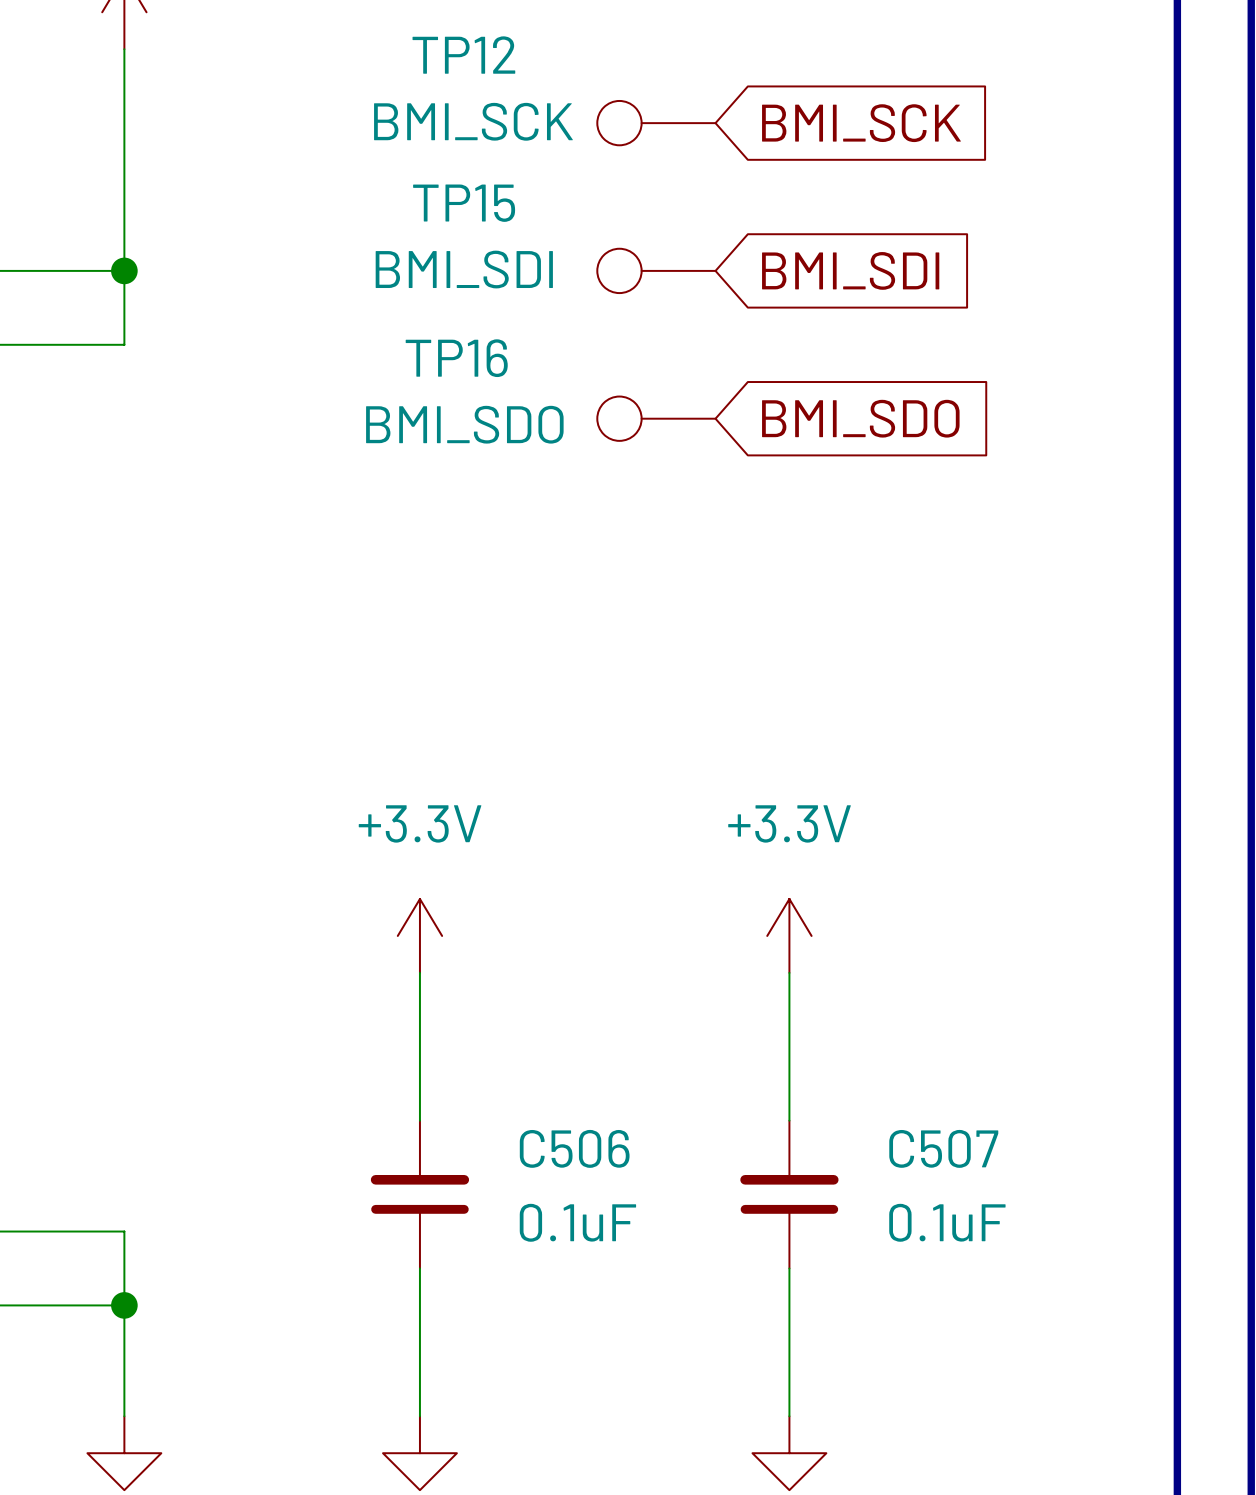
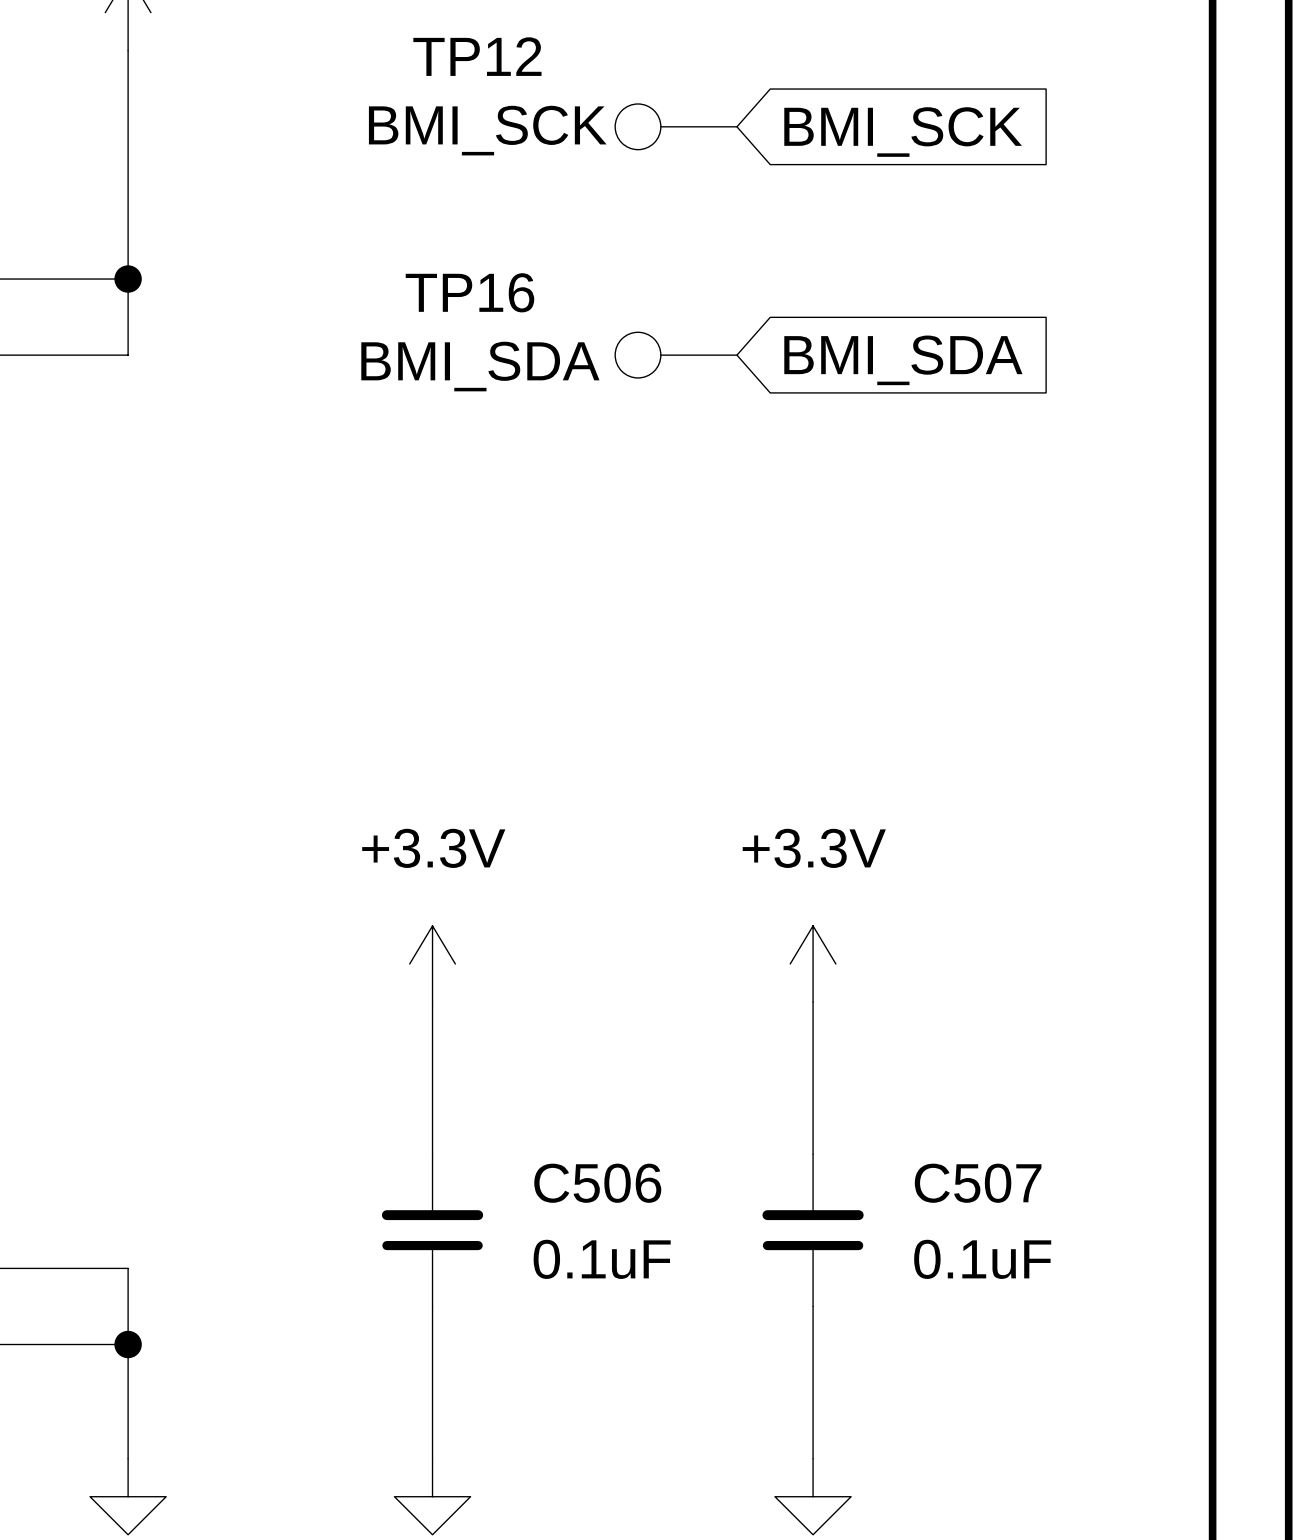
TP15: BMI_SDI (656, 270) -> none
global label: BMI_SDI (850, 270) -> none
global label: none -> BMI_SDA (903, 360)
TP16 position: (656, 418) -> (676, 355)
global label: BMI_SDO (860, 418) -> none
TP16 value: BMI_SDO (464, 424) -> BMI_SDA (480, 366)

